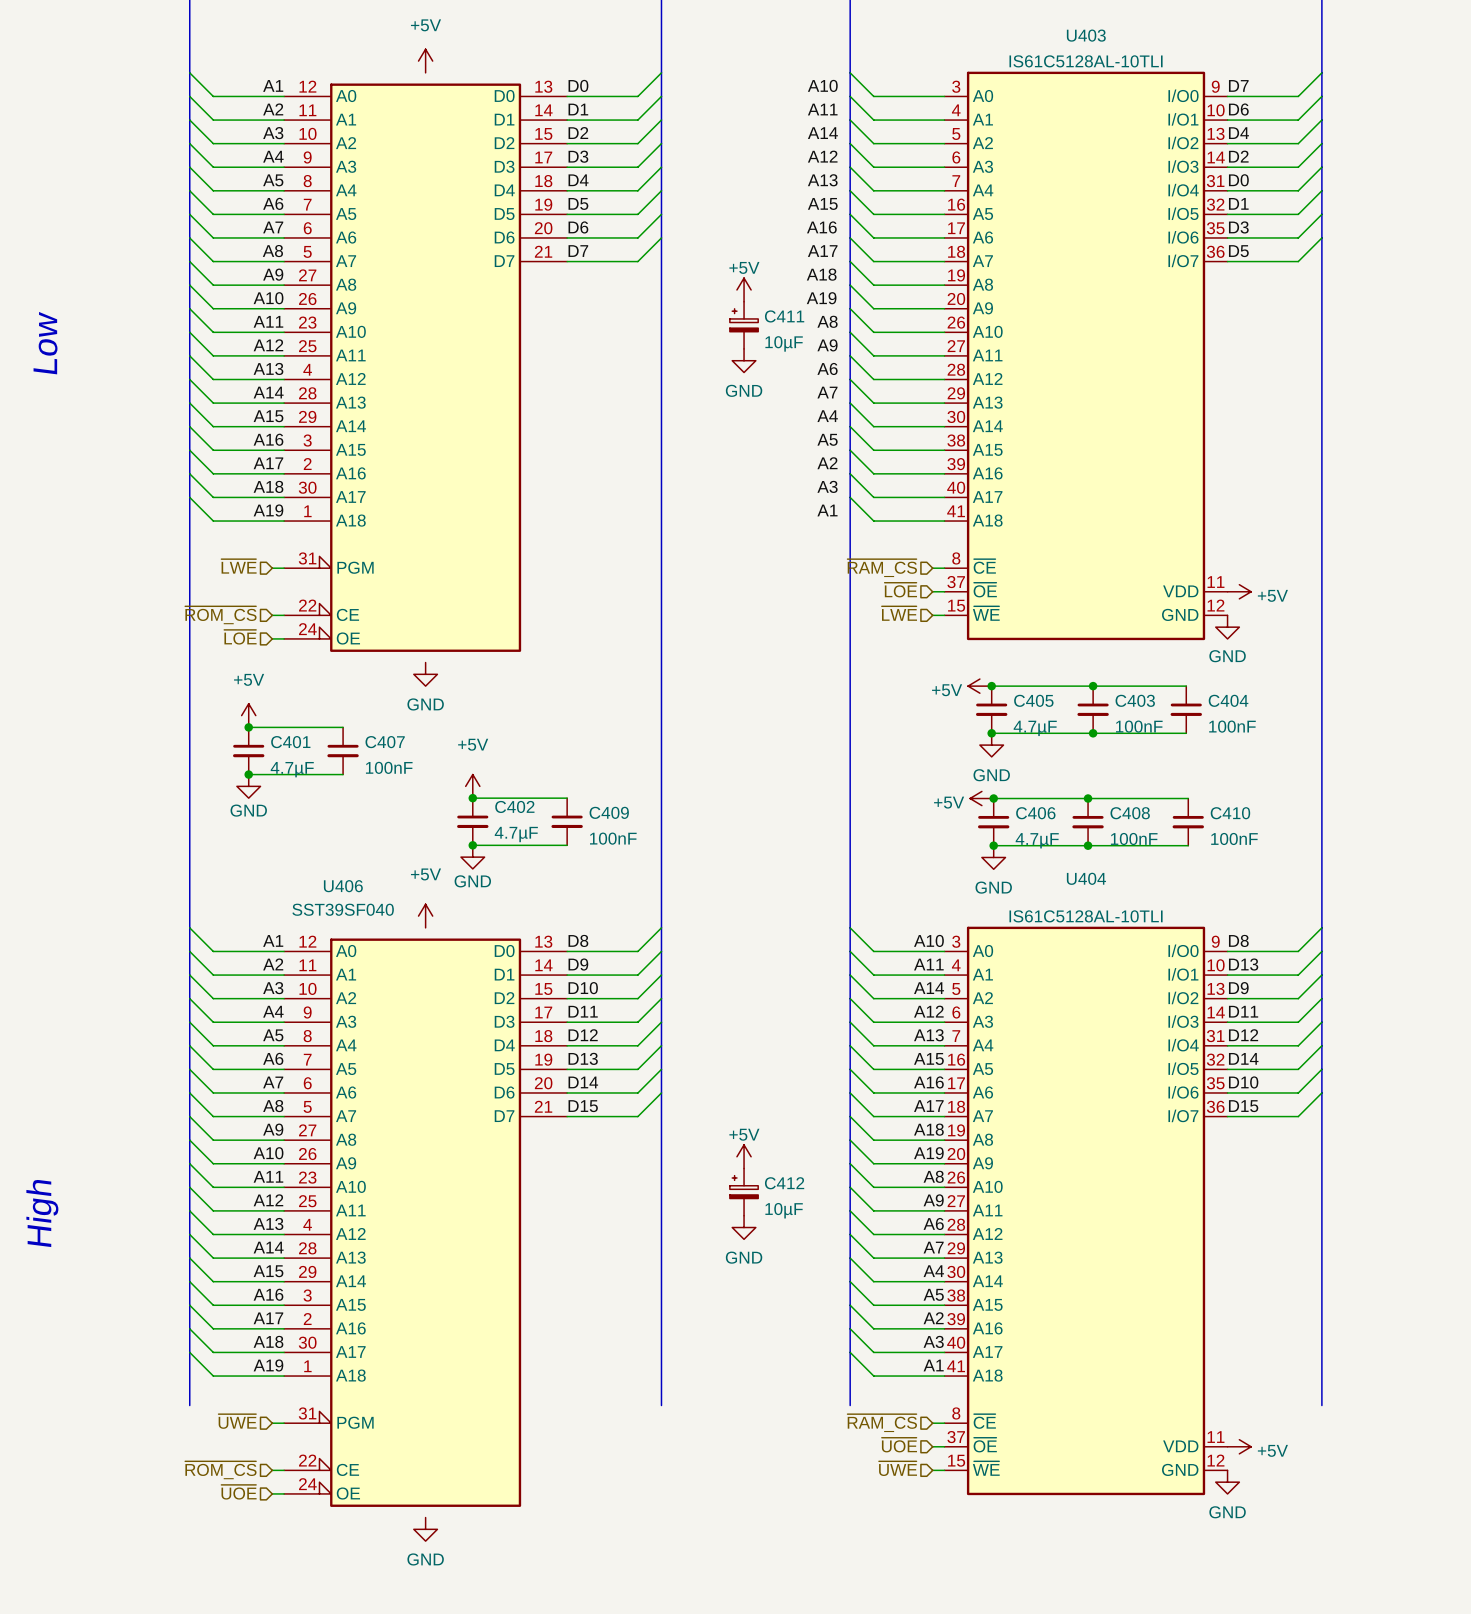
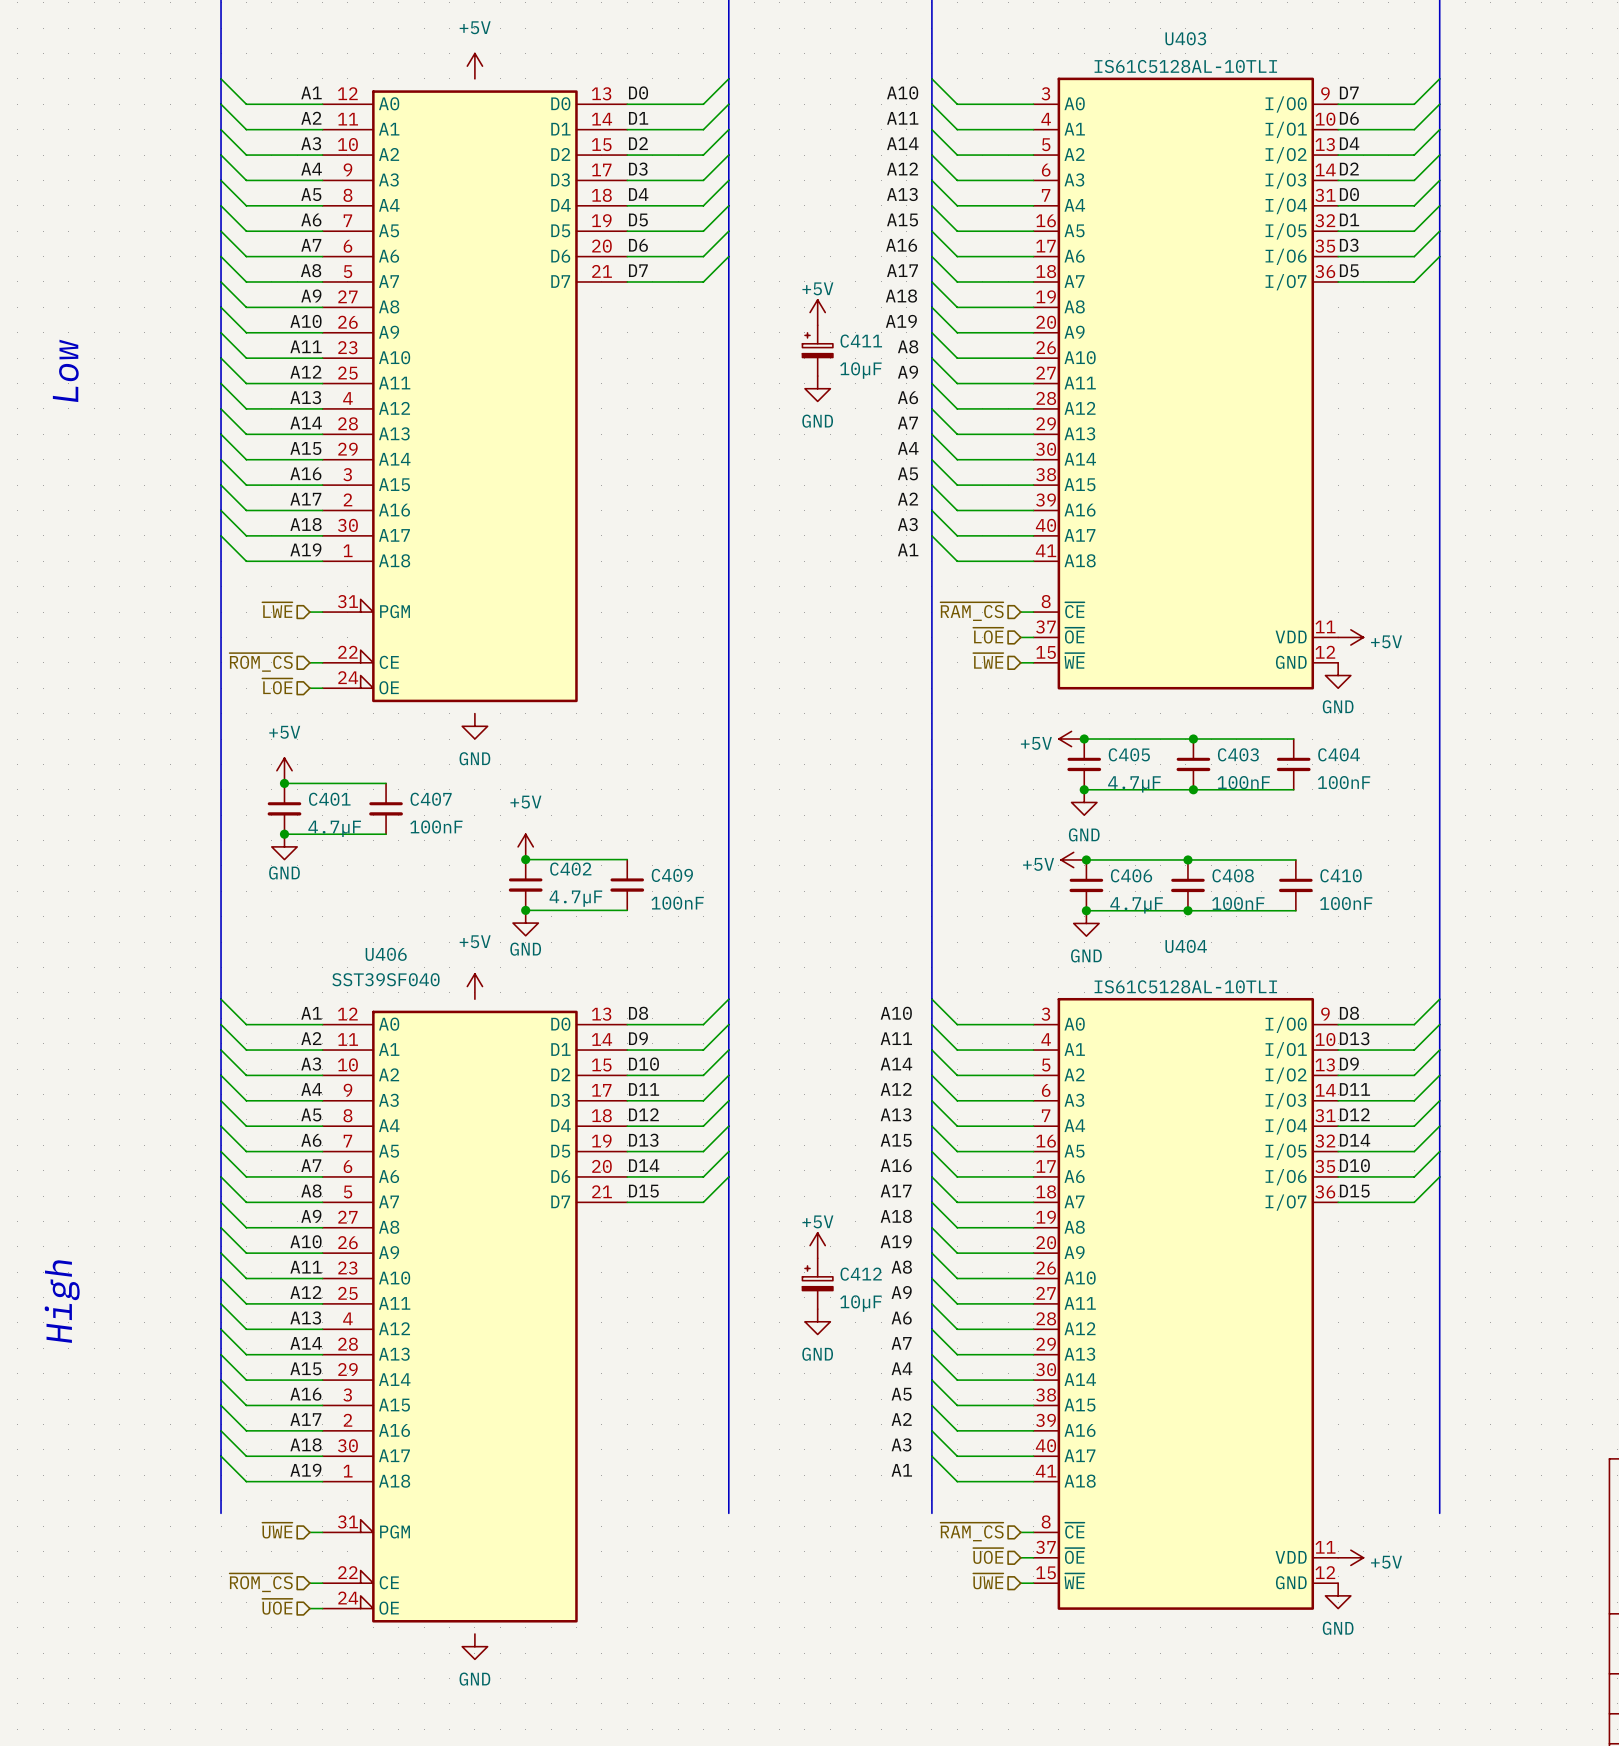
label position: A10 (928, 940) -> A10 (896, 1013)
label position: A11 (928, 964) -> A11 (896, 1038)
label position: A14 (929, 988) -> A14 (896, 1064)
label position: A12 (928, 1011) -> A12 (896, 1089)
label position: A13 (928, 1035) -> A13 (896, 1114)
label position: A15 (928, 1058) -> A15 (896, 1140)
label position: A16 (928, 1082) -> A16 (896, 1165)
label position: A17 (928, 1106) -> A17 (896, 1191)
label position: A18 (928, 1129) -> A18 (896, 1216)
label position: A19 (928, 1153) -> A19 (896, 1241)
label position: A8 (933, 1176) -> A8 (901, 1267)
label position: A9 (933, 1200) -> A9 (901, 1292)
label position: A6 (933, 1223) -> A6 (901, 1318)
label position: A7 (933, 1247) -> A7 (901, 1343)
label position: A4 (933, 1271) -> A4 (901, 1368)
label position: A5 (933, 1294) -> A5 (901, 1394)
label position: A2 (933, 1318) -> A2 (901, 1419)
label position: A3 (933, 1341) -> A3 (901, 1444)
label position: A1 (933, 1365) -> A1 (901, 1470)

